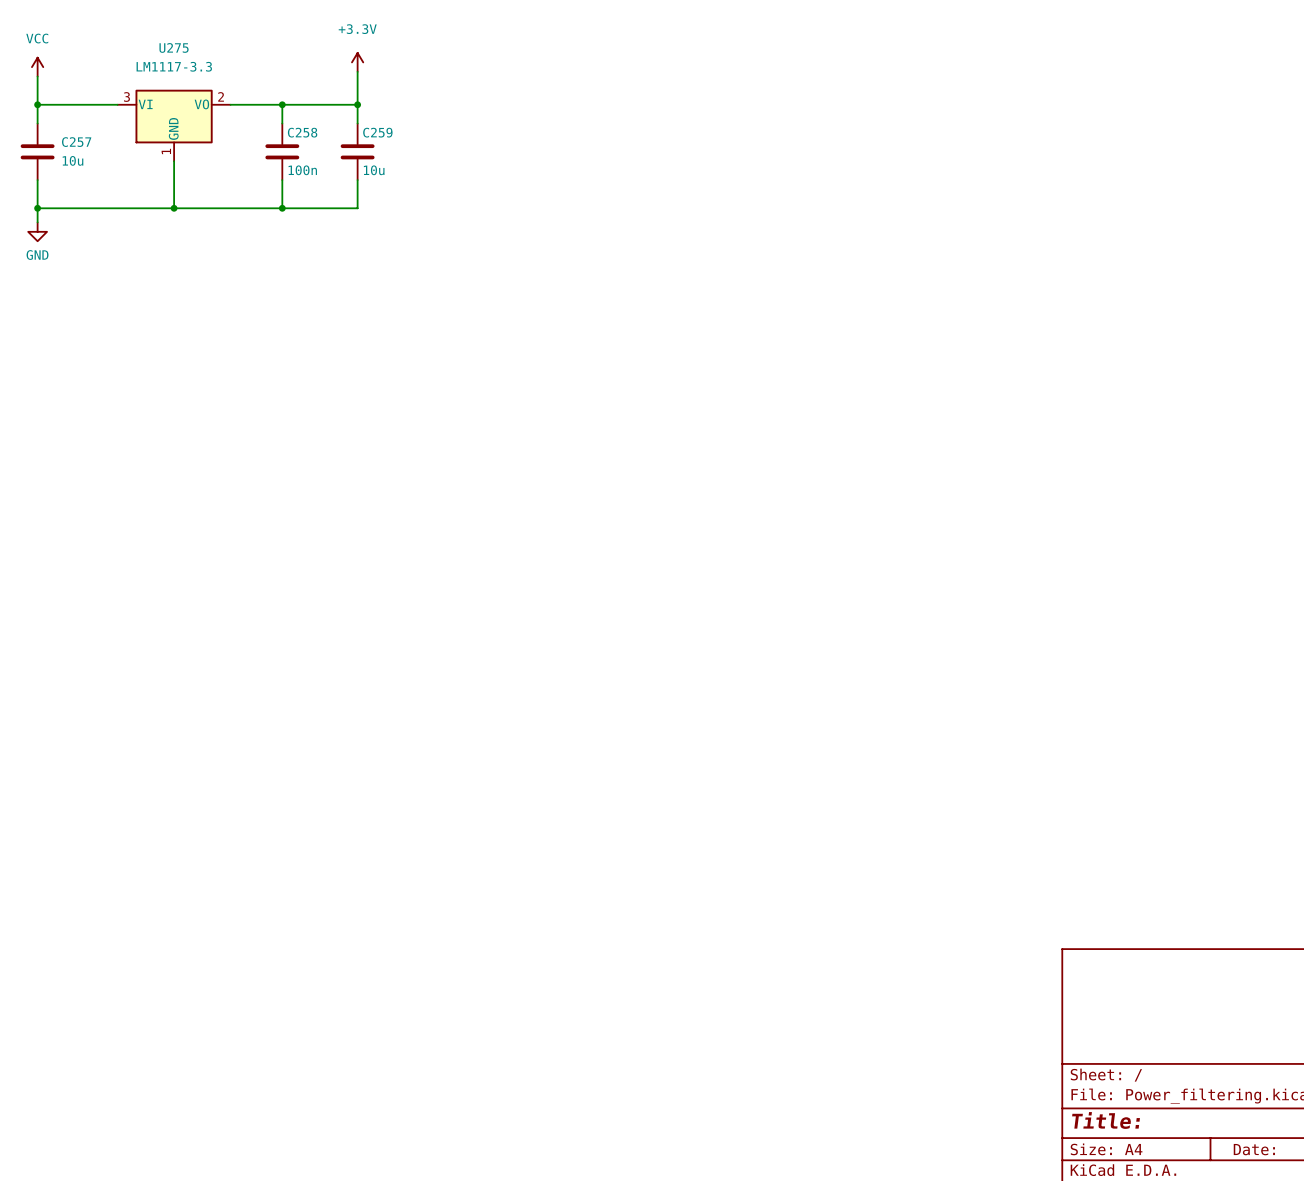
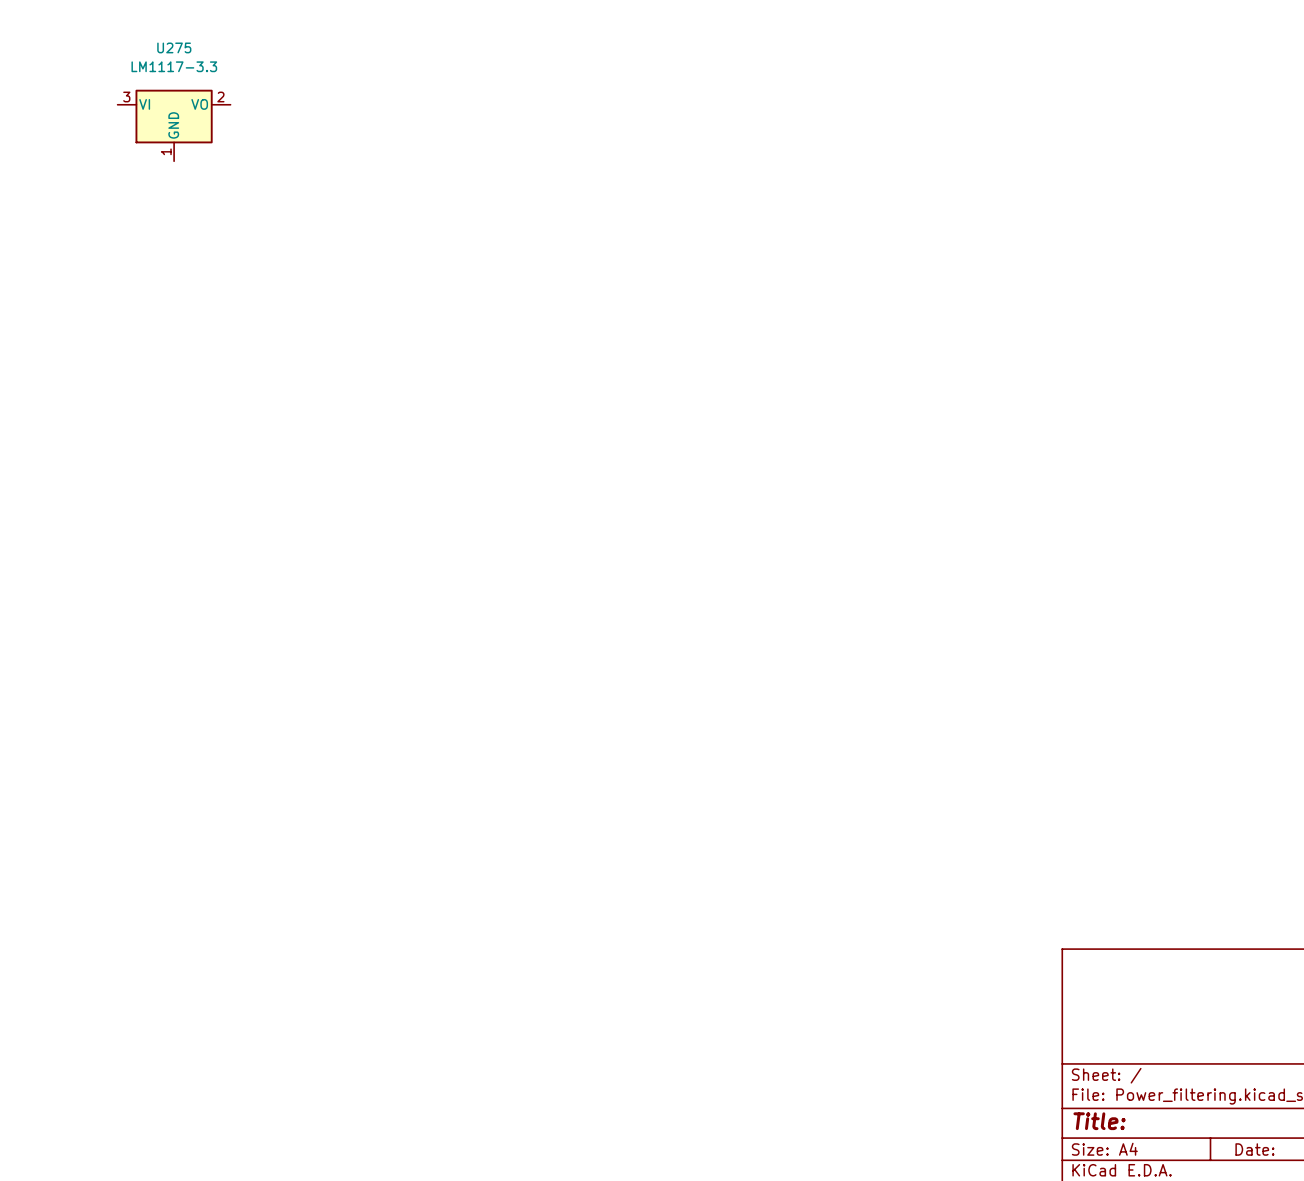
power symbol: +3.3V (357, 62) -> none
power symbol: VCC (37, 67) -> none
wire: (357, 71) (357, 123) -> none
wire: (37, 76) (37, 123) -> none
wire: (37, 104) (117, 104) -> none
junction: (37, 104) -> none
wire: (230, 104) (357, 104) -> none
wire: (282, 104) (282, 123) -> none
junction: (282, 104) -> none
junction: (357, 104) -> none
C257: 10u (37, 151) -> none
C258: 100n (282, 151) -> none
C259: 10u (357, 151) -> none
wire: (174, 161) (174, 208) -> none
wire: (37, 180) (37, 222) -> none
wire: (282, 180) (282, 208) -> none
wire: (357, 180) (357, 208) (37, 208) -> none
junction: (37, 208) -> none
junction: (174, 208) -> none
junction: (282, 208) -> none
power symbol: GND (37, 231) -> none

